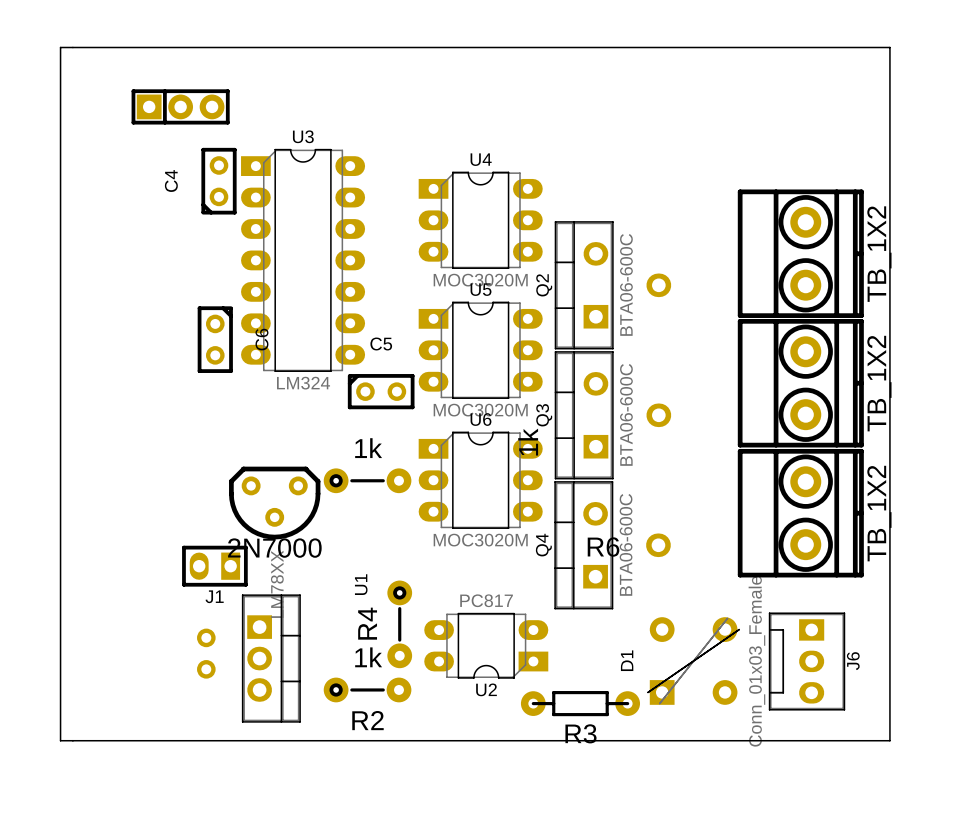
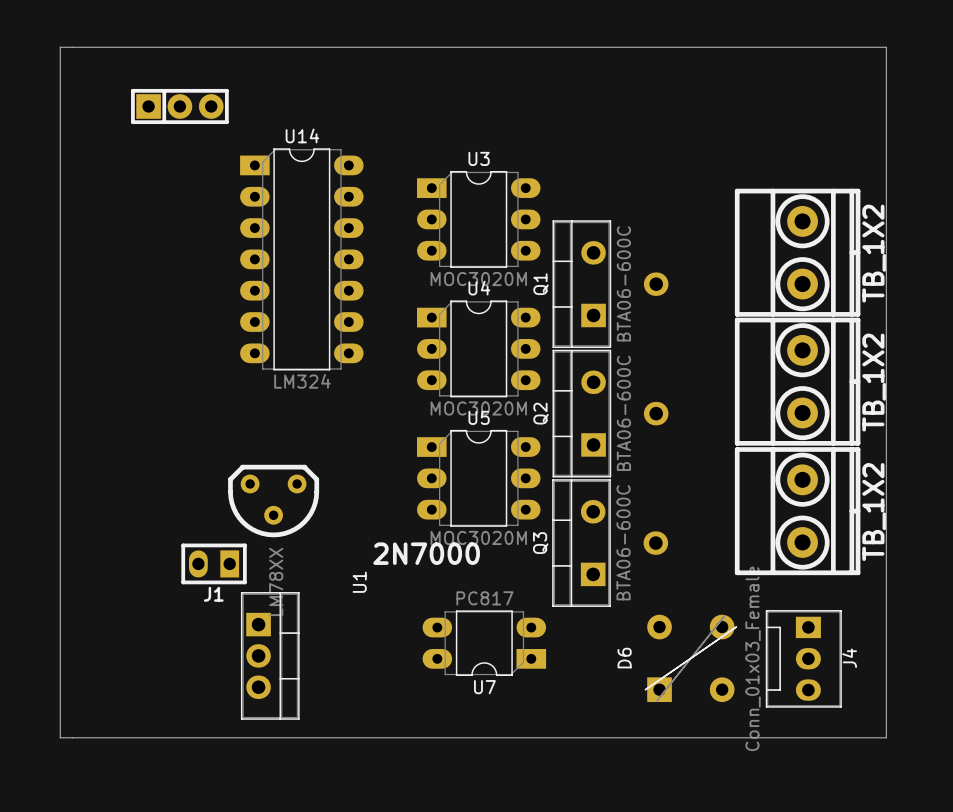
U3 name: U3 (303, 136) -> U14 (302, 135)
U4 name: U4 (481, 159) -> U3 (479, 158)
C4: (219, 181) -> none
Q2 name: Q2 (544, 285) -> Q1 (541, 284)
U5 name: U5 (481, 289) -> U4 (479, 288)
C6: (215, 339) -> none
C5: (381, 391) -> none
Q3 name: Q3 (544, 415) -> Q2 (541, 413)
U6 name: U6 (480, 419) -> U5 (479, 417)
R6: 1k (367, 480) -> none
Q4 name: Q4 (543, 545) -> Q3 (540, 543)
part value position: 2N7000 (274, 548) -> 2N7000 (426, 553)
R4: 1k (399, 624) -> none
part: (206, 653) -> none
D1 name: D1 (627, 660) -> D6 (624, 658)
J6 name: J6 (853, 661) -> J4 (849, 658)
R2: 1k (367, 689) -> none
U2 name: U2 (486, 689) -> U7 (484, 687)
R3: (580, 703) -> none

